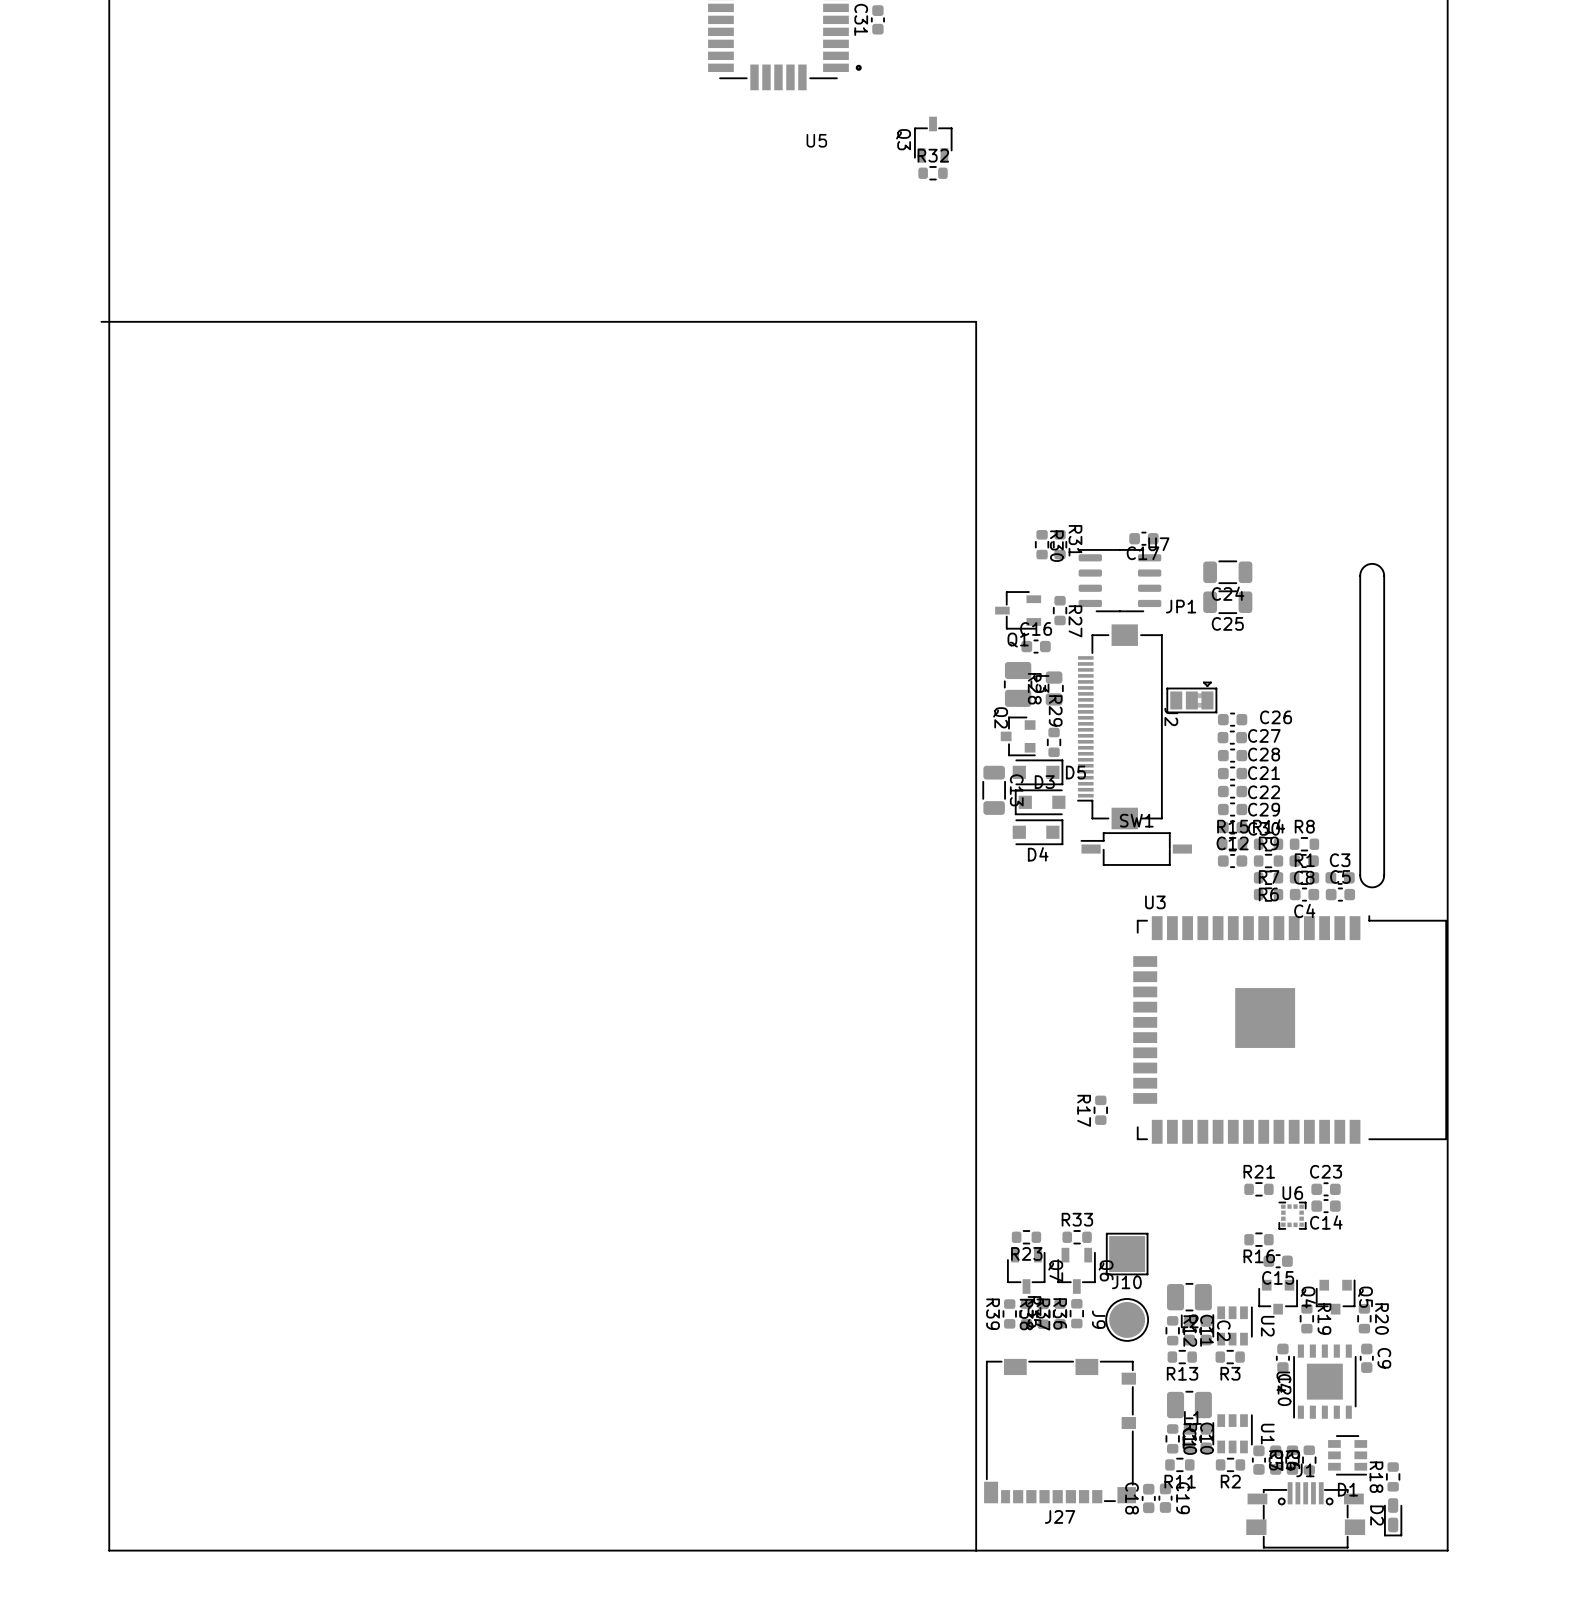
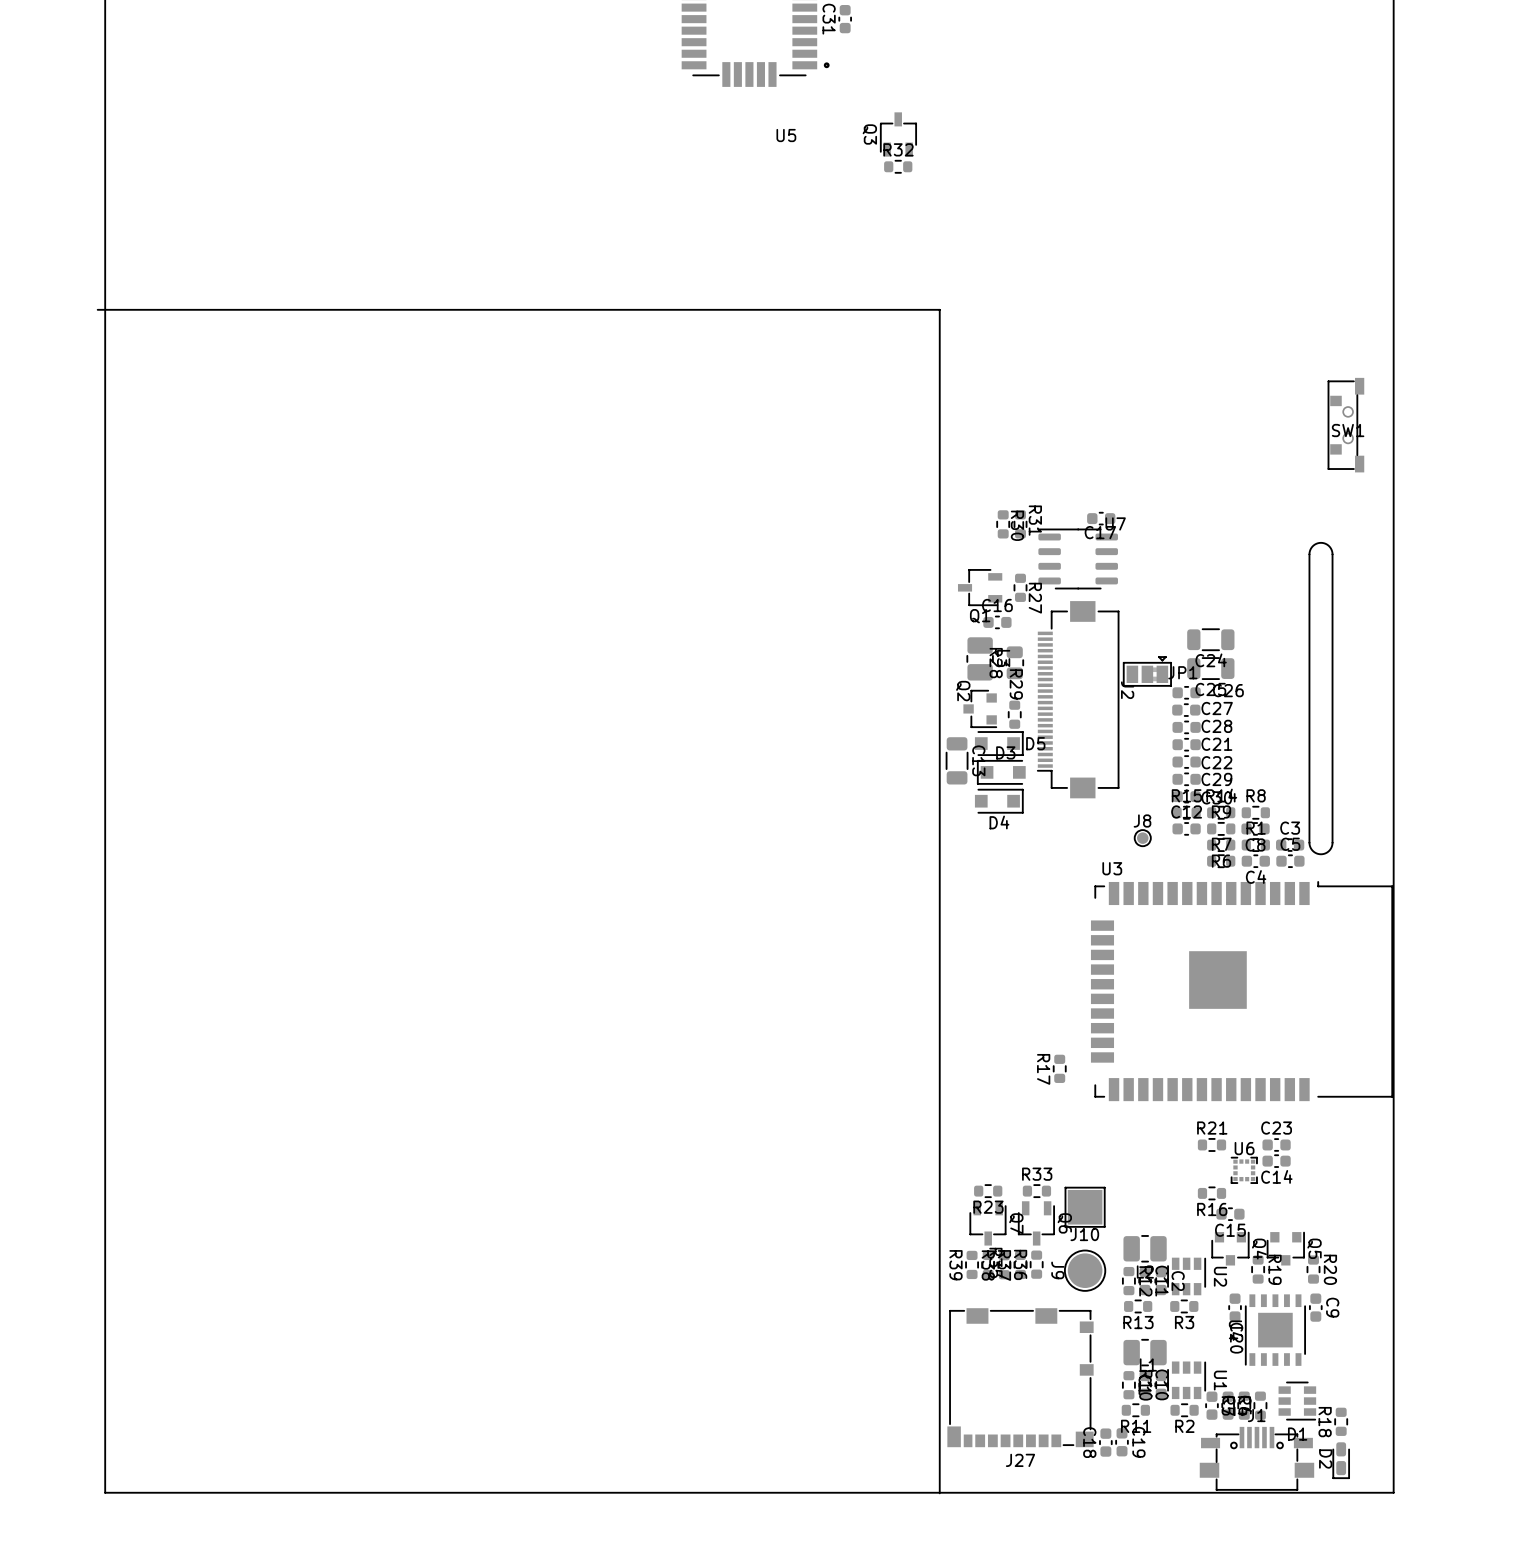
C24 position: (1227, 572) -> (1210, 639)
C25 position: (1227, 602) -> (1210, 668)
JP1 name position: JP1 (1181, 606) -> JP1 (1182, 672)
SW1 name position: SW1 (1136, 820) -> SW1 (1348, 430)
SW1 footprint: [1080, 832, 1192, 866] -> [1327, 377, 1365, 473]
J8: none -> (1142, 838)

